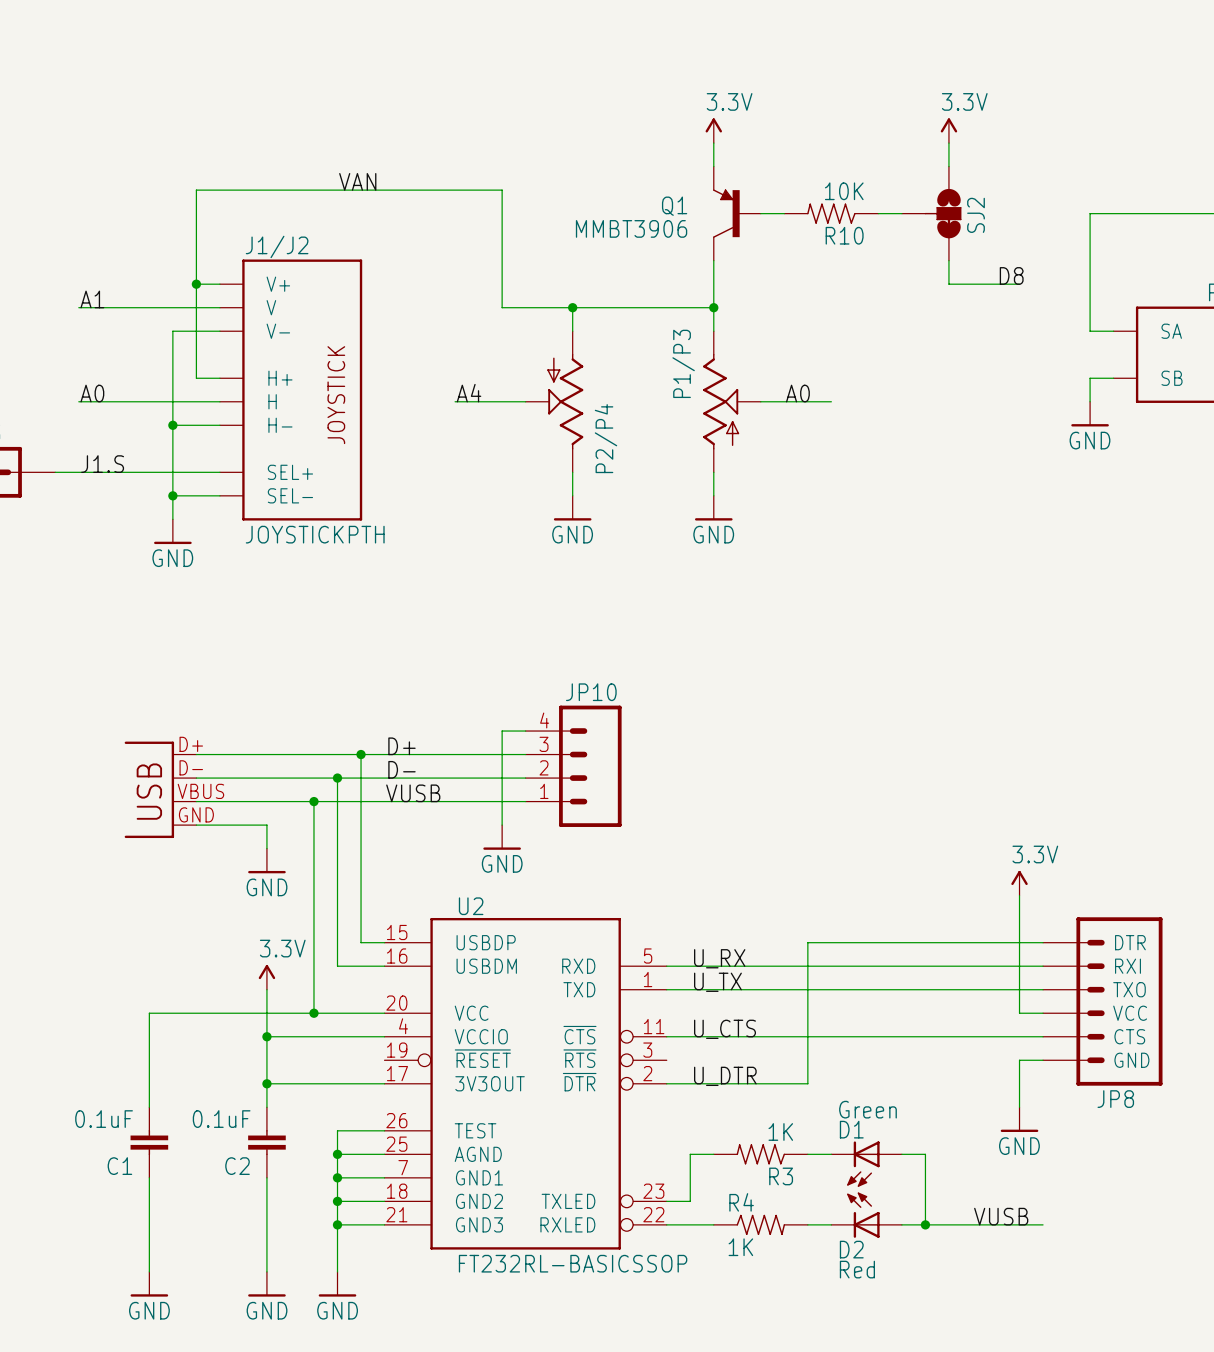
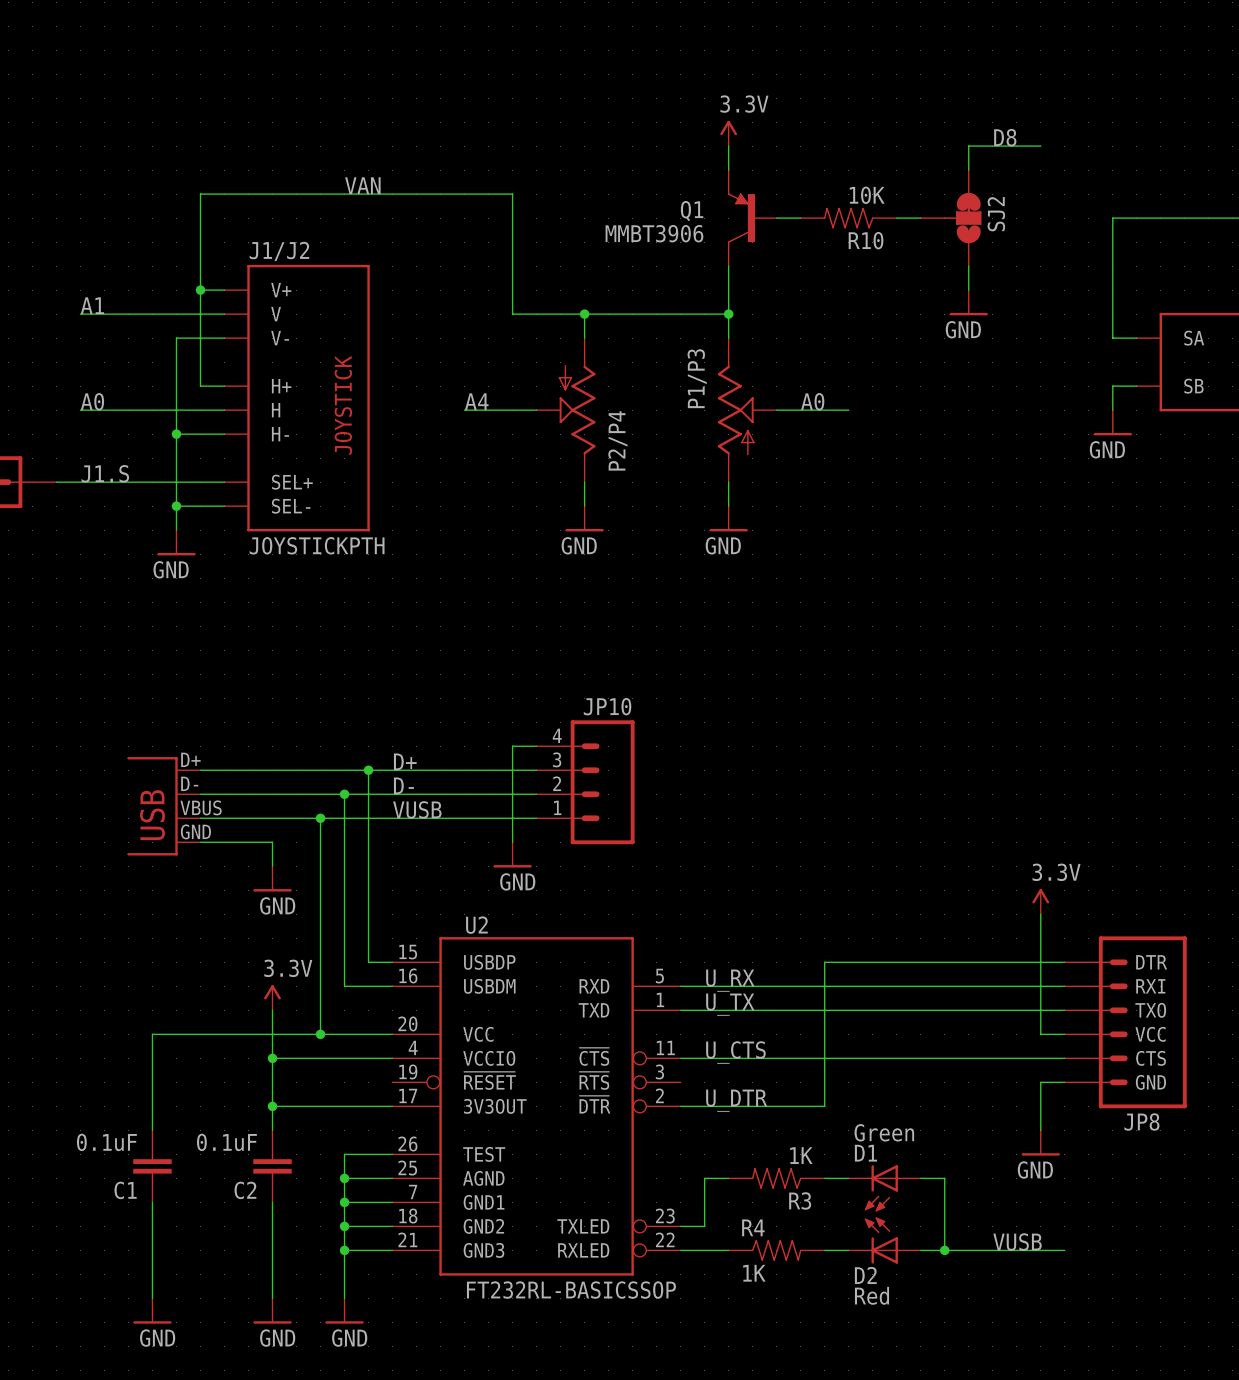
power symbol: 3.3V (948, 130) -> none
SJ2 flip: as is (943, 213) -> up-down (962, 218)
label position: D8 (1011, 275) -> D8 (1005, 137)
wire: (948, 284) (1019, 284) -> (968, 146) (1040, 146)
power symbol: none -> GND (968, 302)

